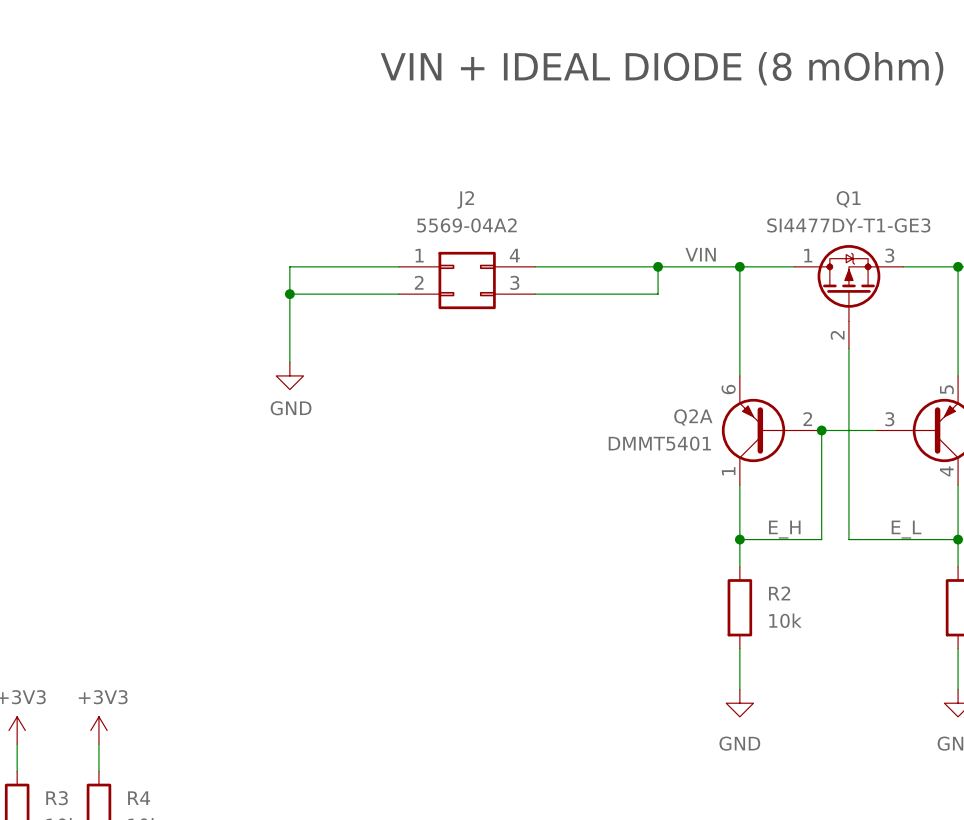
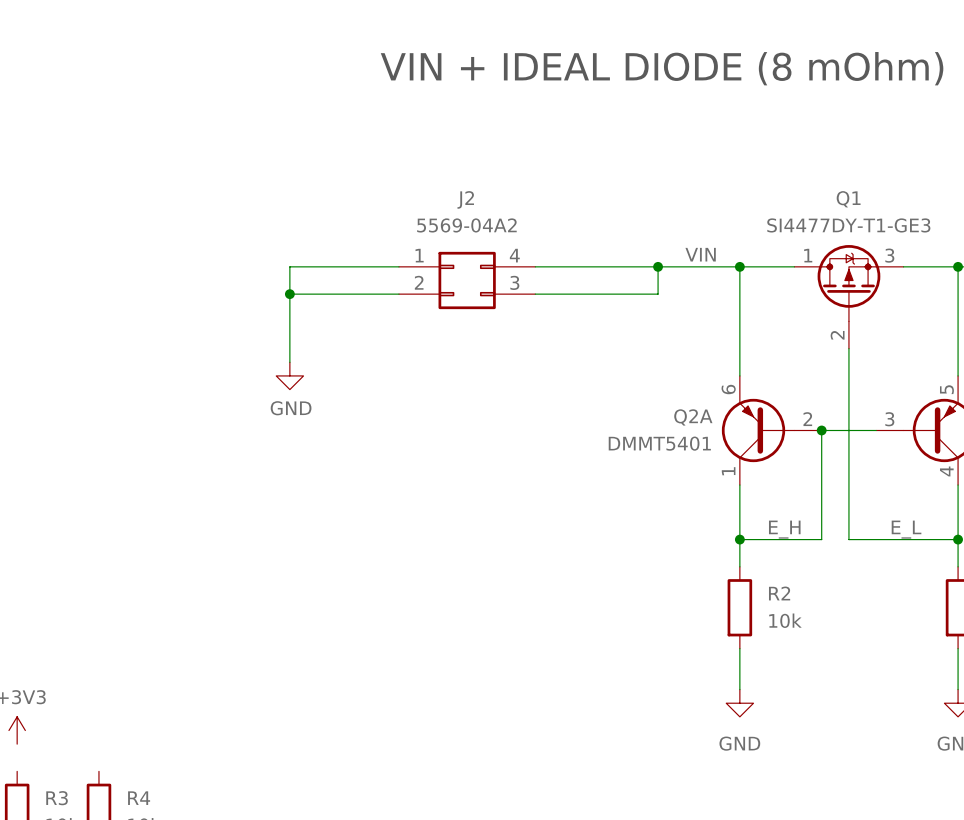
power symbol: +3V3 (98, 730) -> none
wire: (17, 744) (17, 771) -> none
wire: (98, 744) (98, 771) -> none

